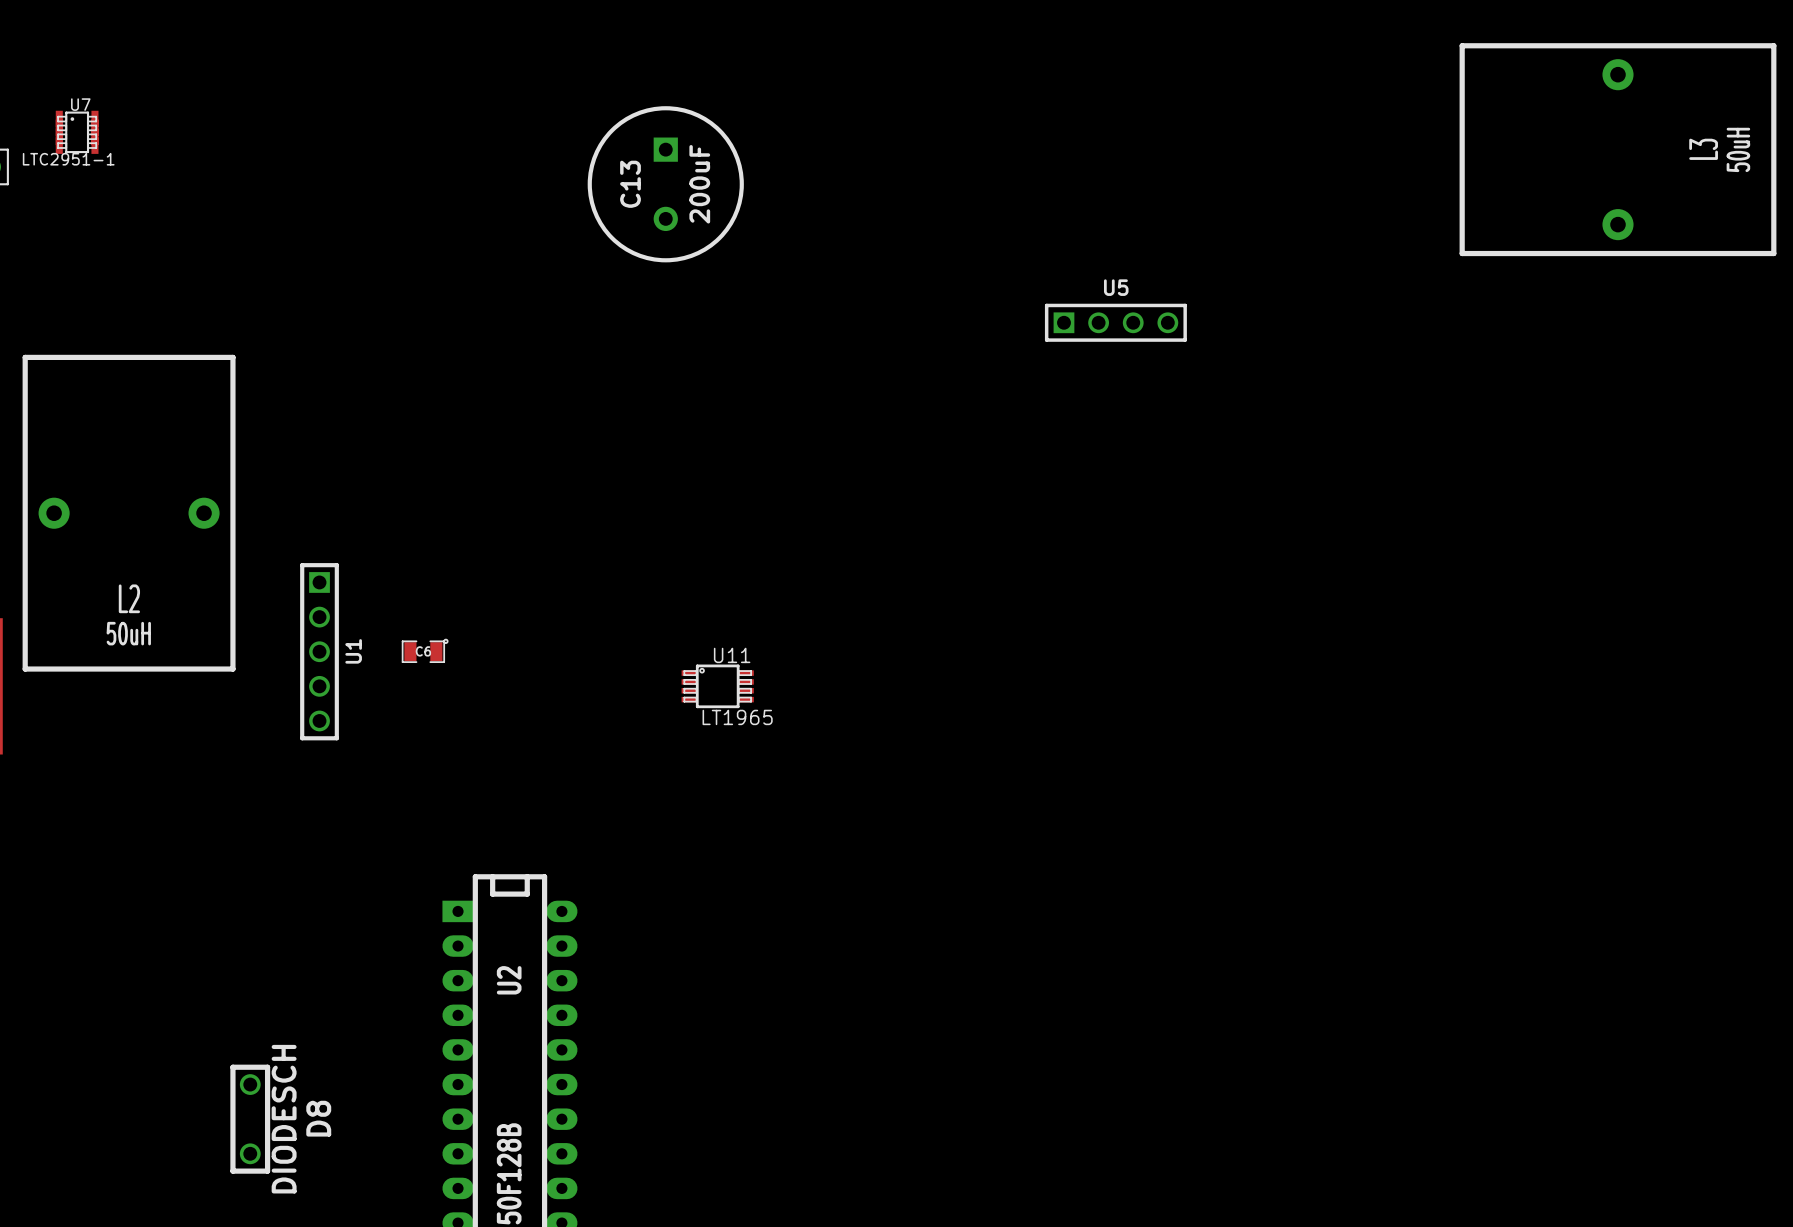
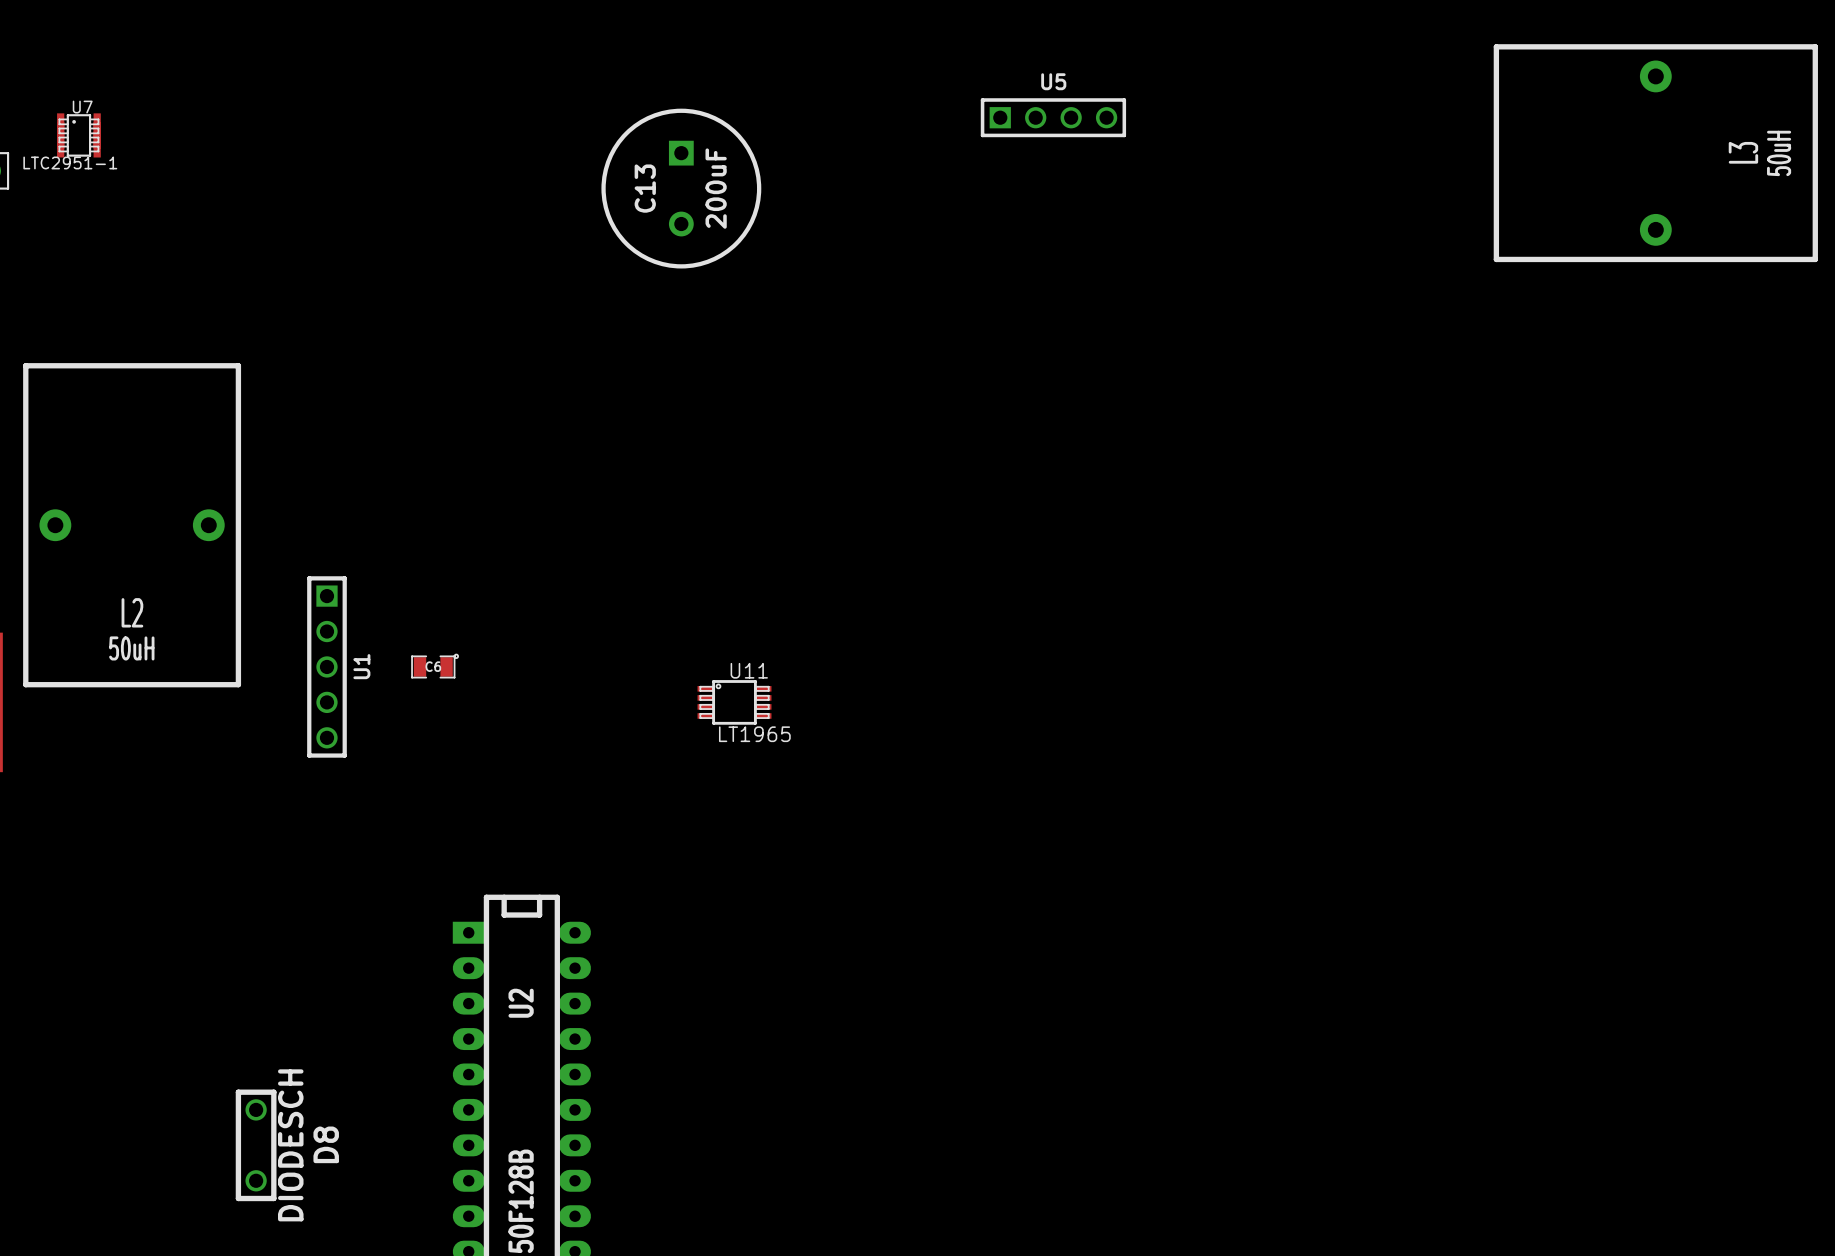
U5 position: (1115, 322) -> (1053, 117)

